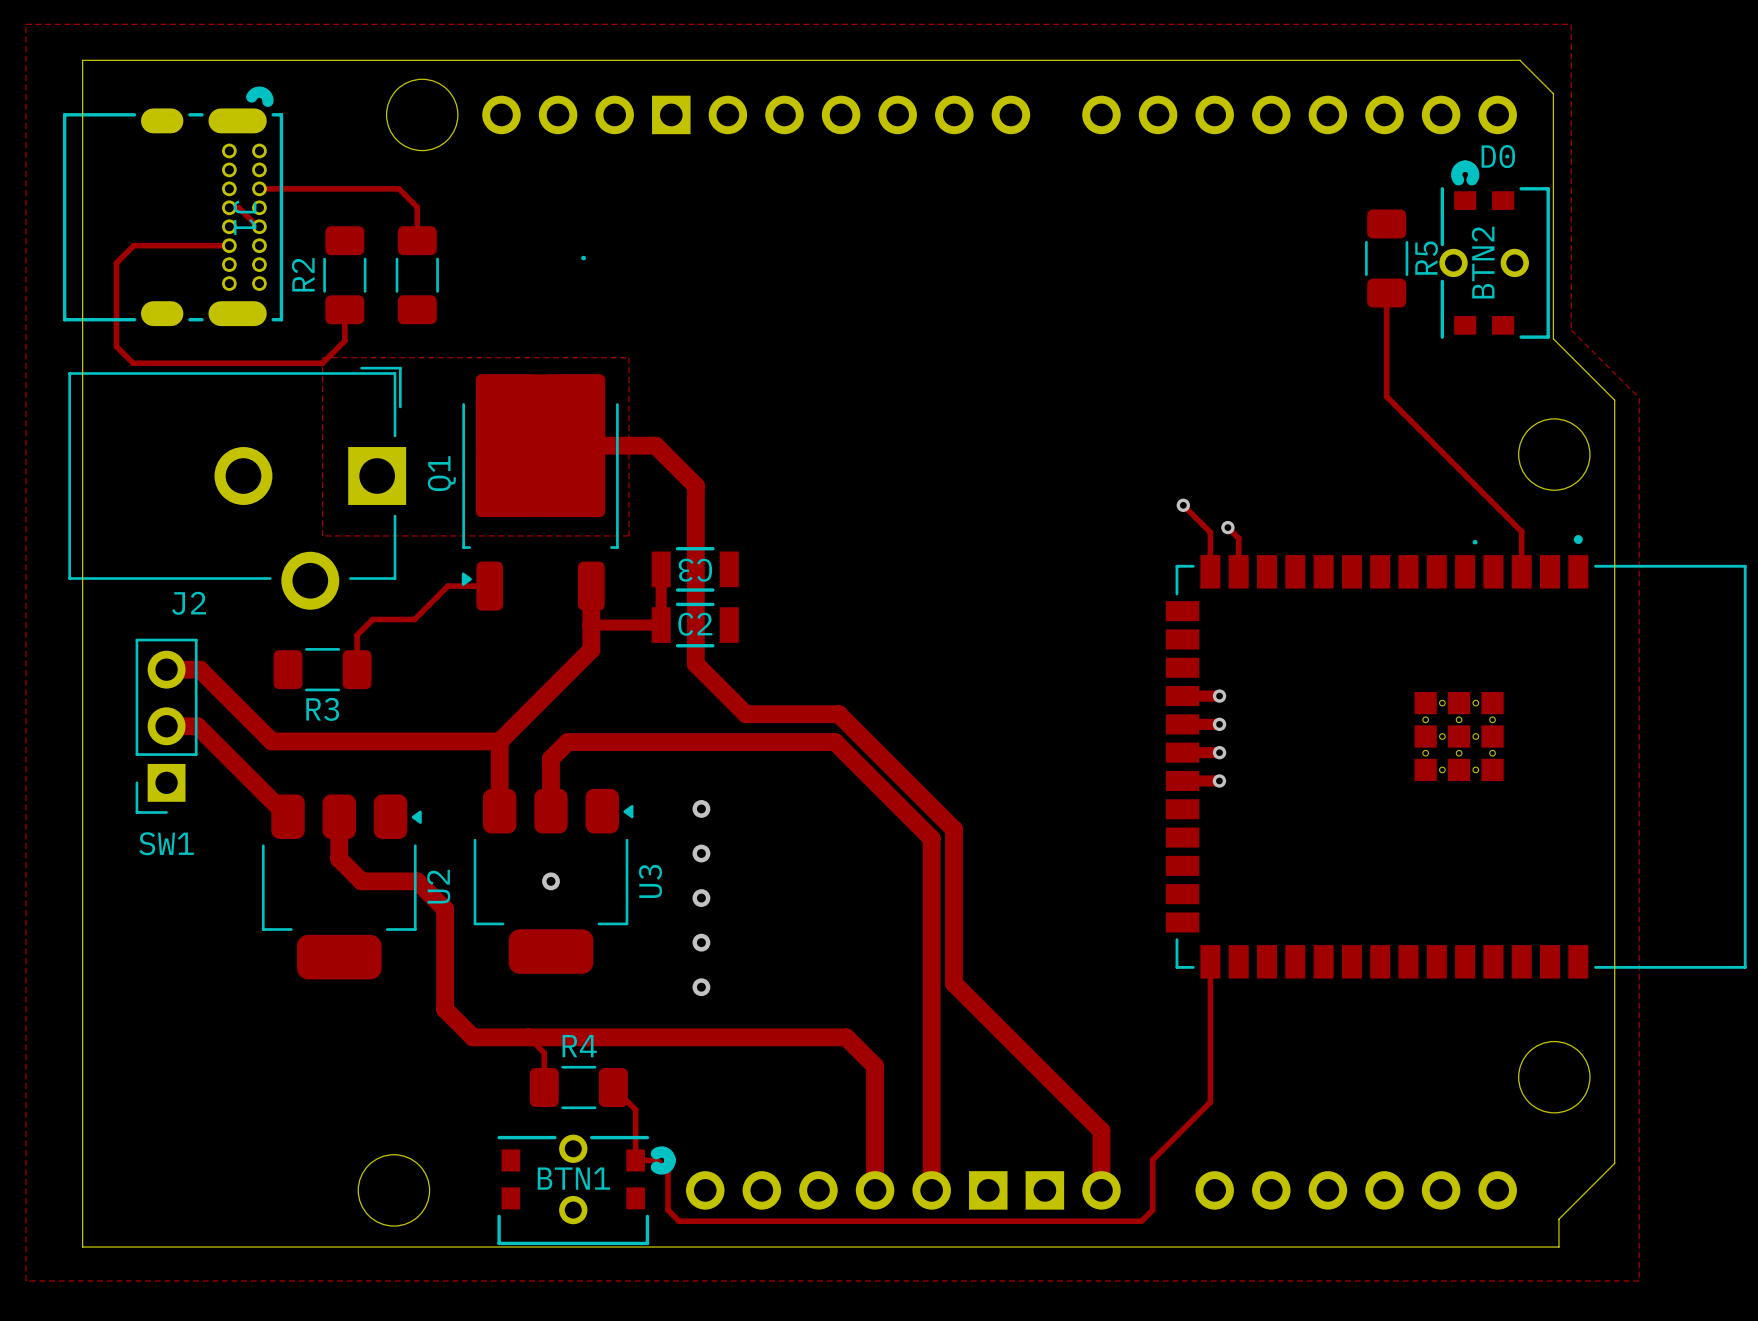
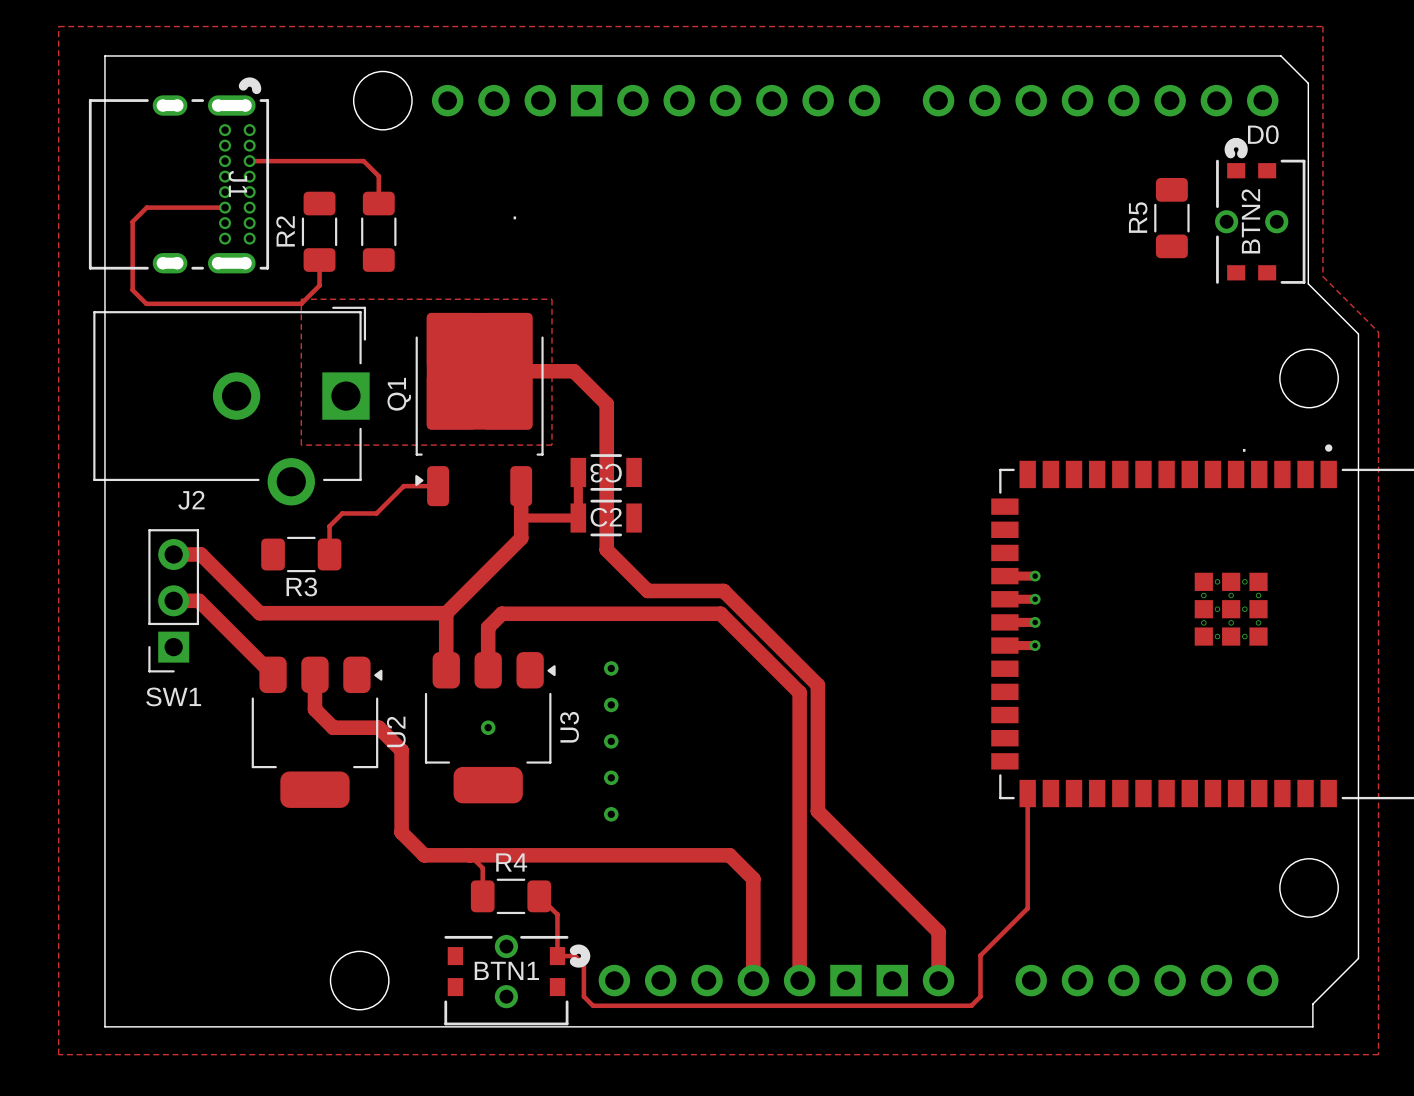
track: (229, 207) (238, 207) (259, 226) -> none
R5 name position: R5 (1426, 258) -> R5 (1138, 217)
track: (1386, 293) (1386, 396) (1521, 531) (1521, 571) -> none
track: (1183, 505) (1210, 532) (1210, 571) -> none
via: (1183, 505) -> none
track: (1227, 527) (1238, 538) (1238, 571) -> none
via: (1227, 527) -> none

